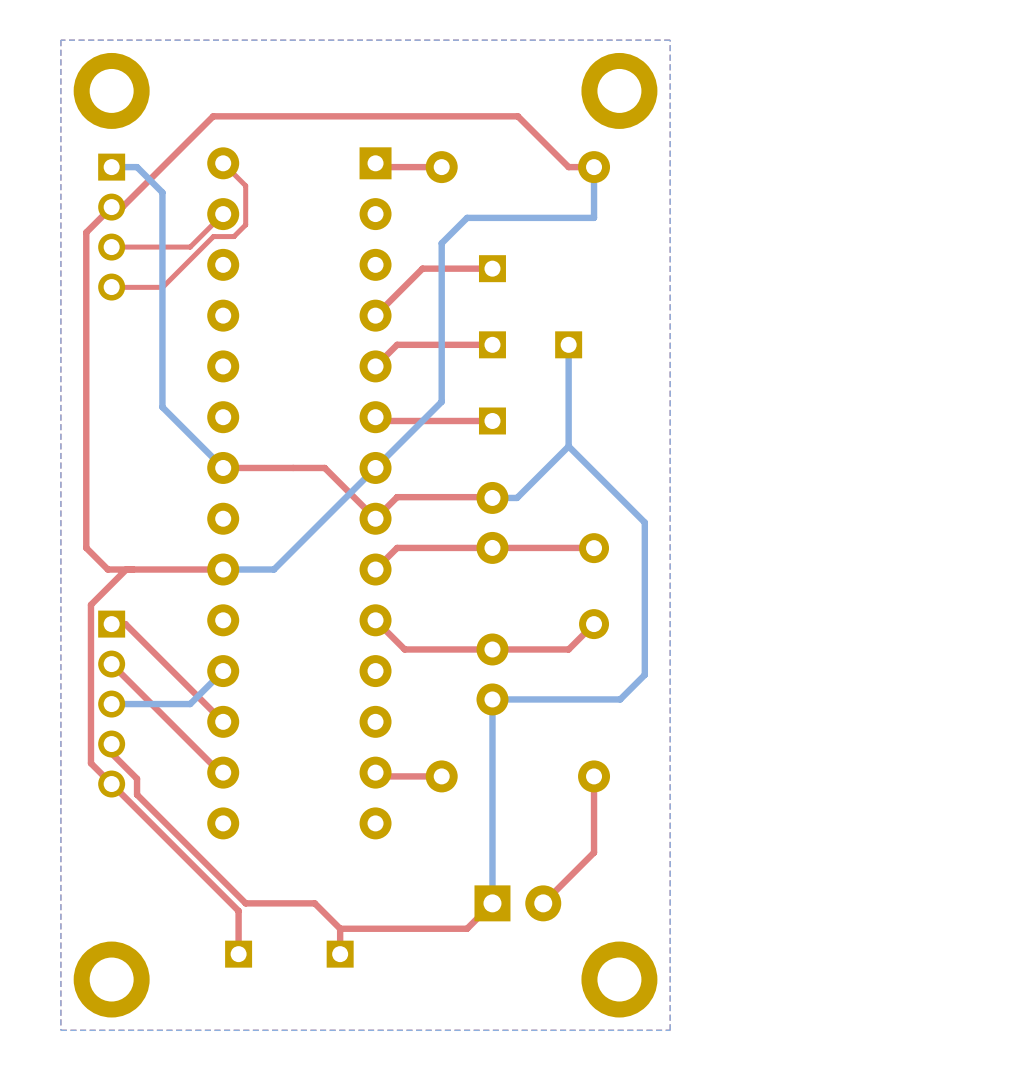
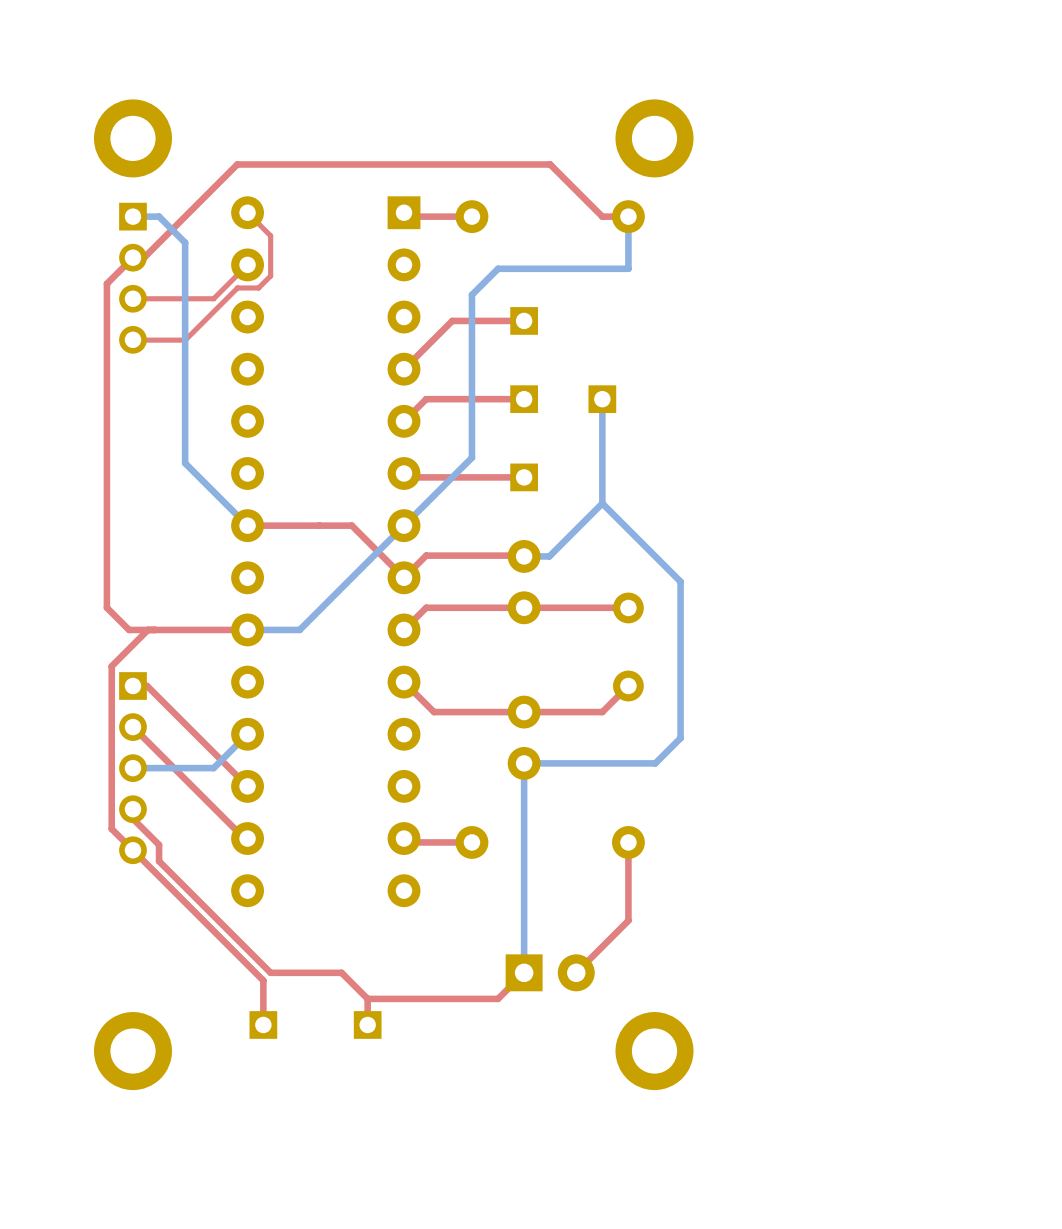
bottom zone outline: (670, 40) (670, 1030) (60, 1030) (60, 40) (670, 40) -> none

